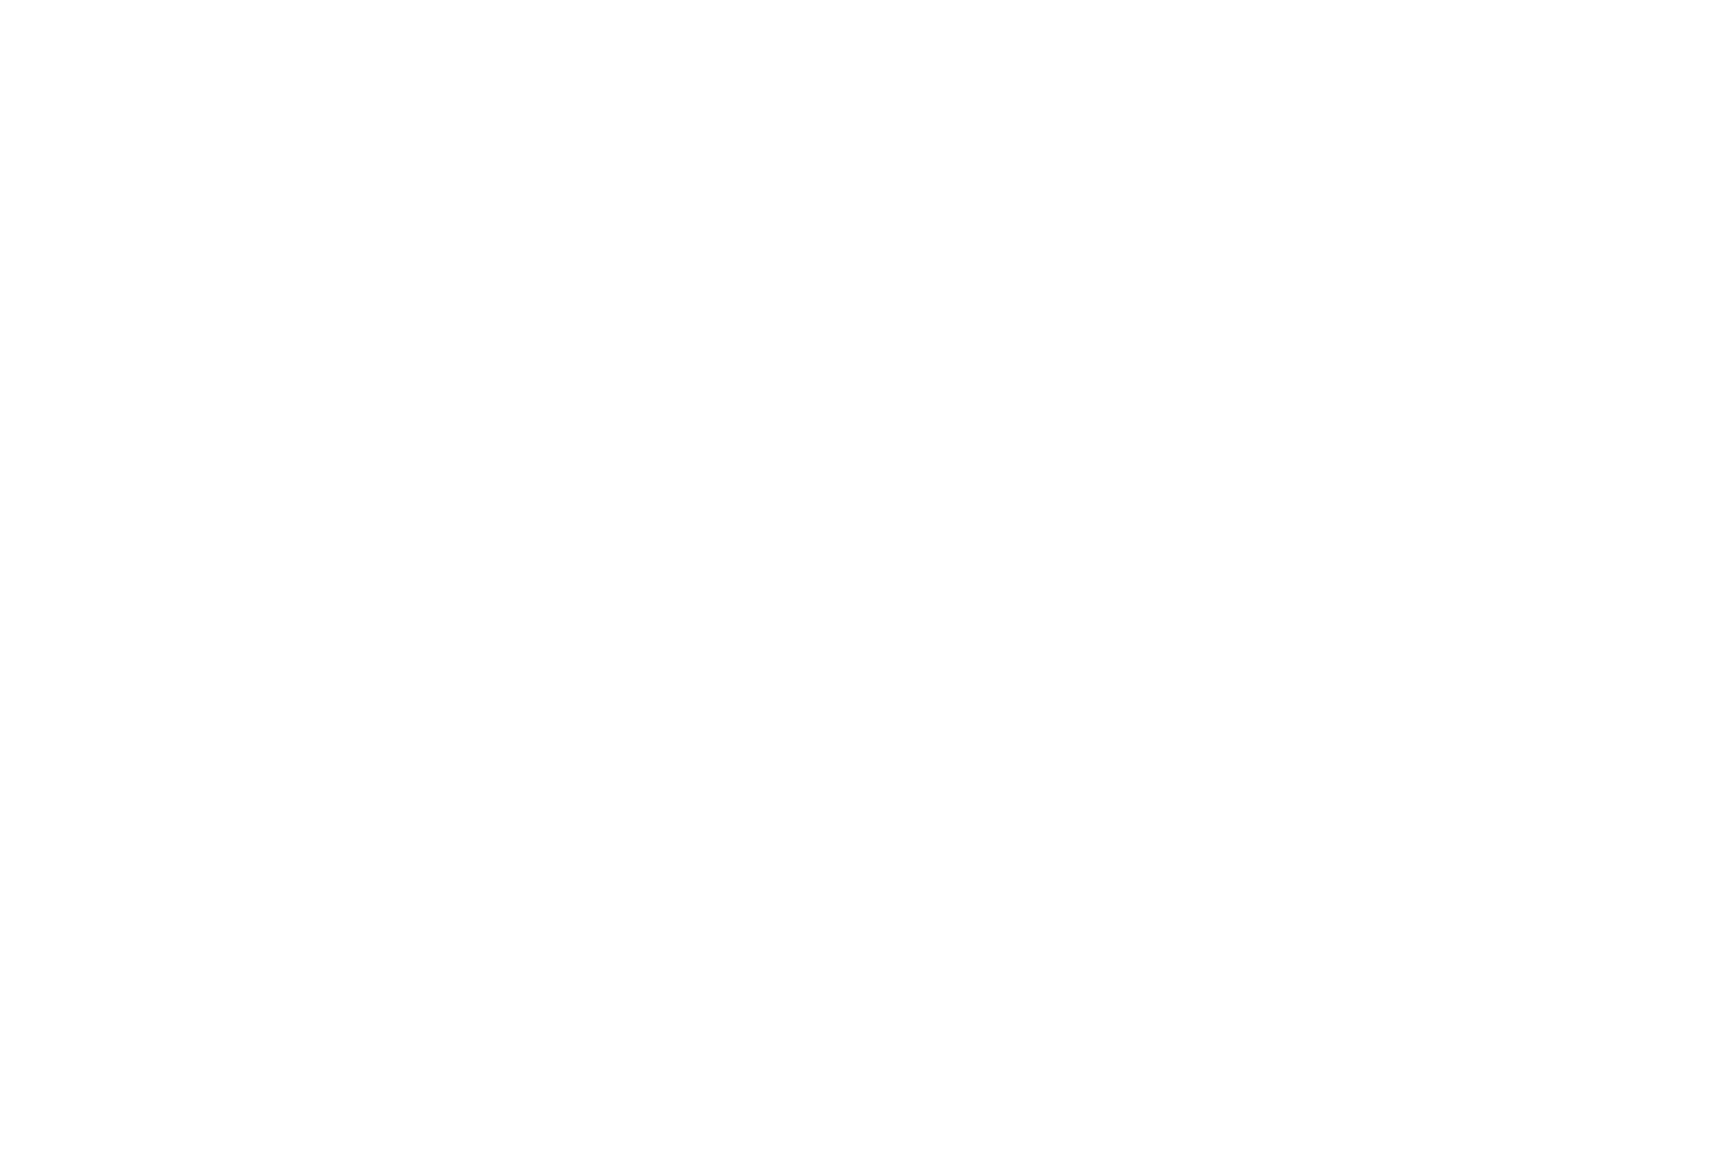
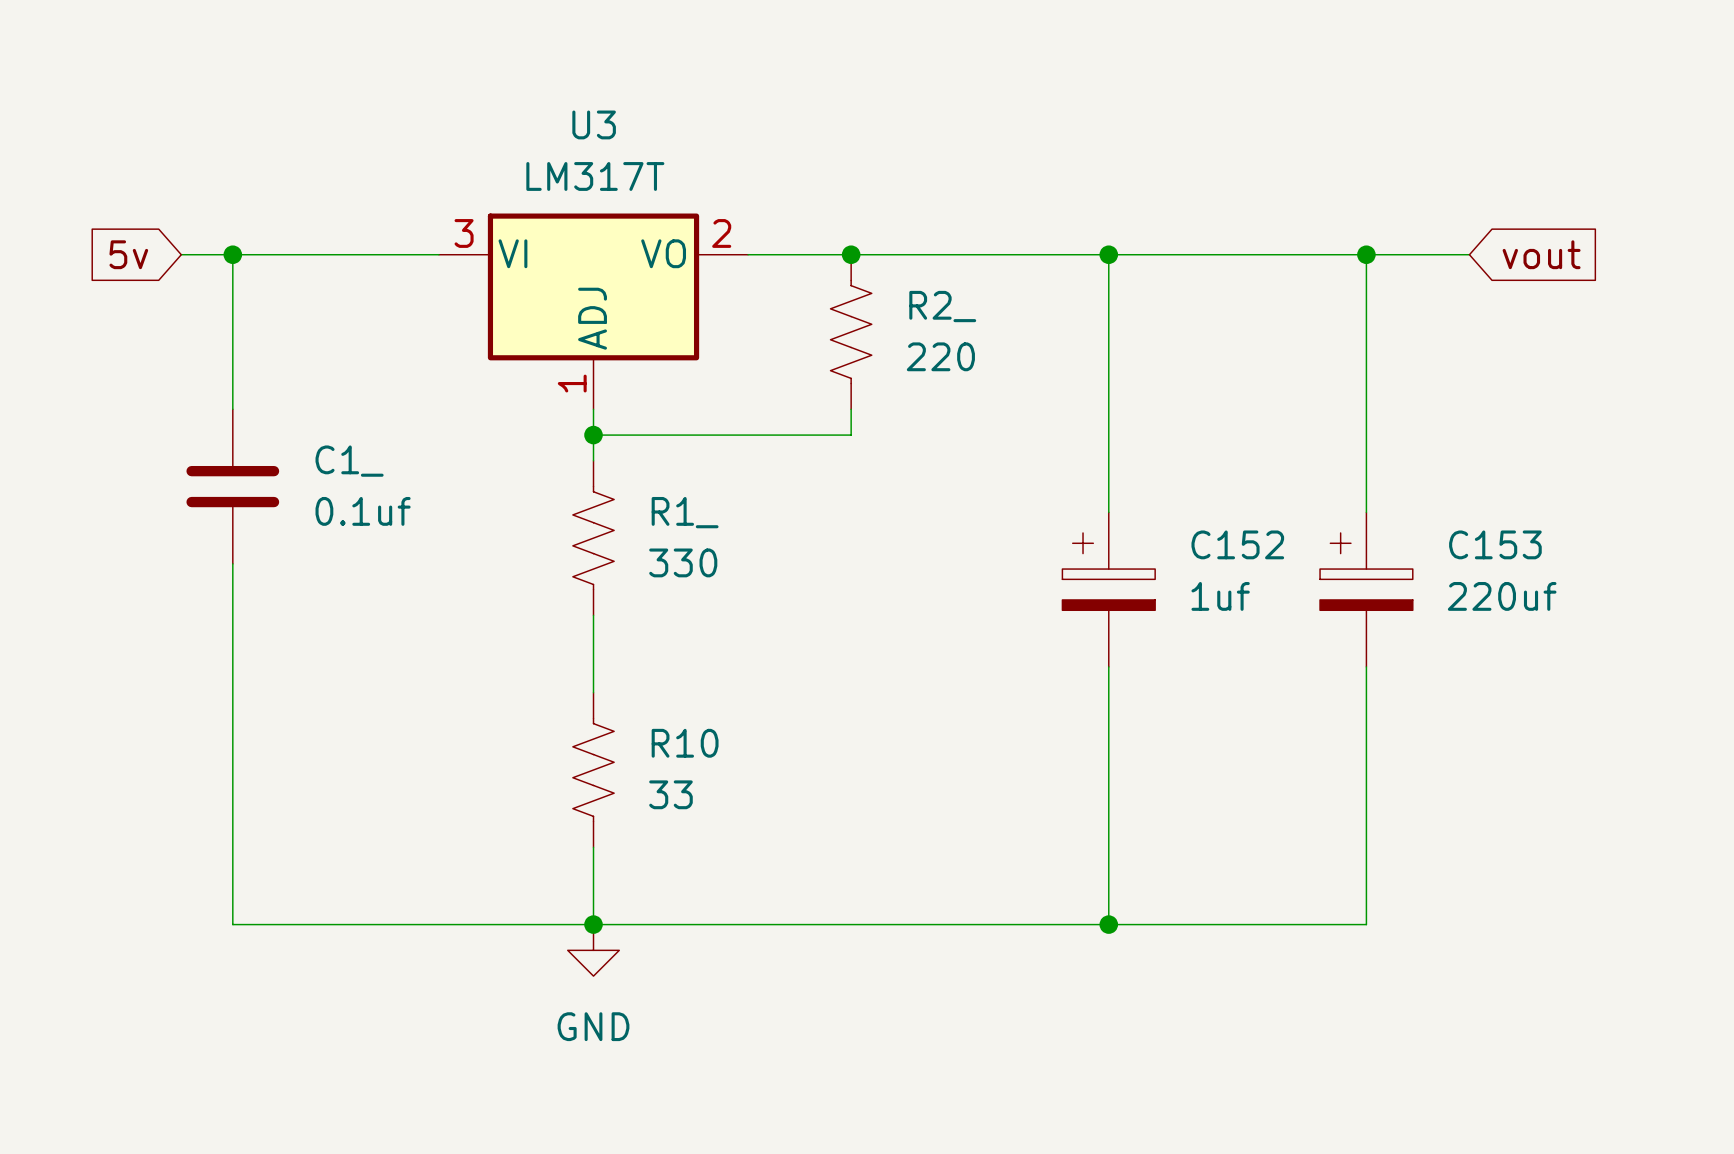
global label: none -> 5v (128, 254)
wire: none -> (181, 254) (438, 254)
wire: none -> (232, 254) (232, 409)
junction: none -> (232, 254)
wire: none -> (748, 254) (1469, 254)
junction: none -> (851, 254)
wire: none -> (1108, 254) (1108, 512)
junction: none -> (1108, 254)
wire: none -> (1366, 254) (1366, 512)
junction: none -> (1366, 254)
global label: none -> vout (1541, 254)
U3: none -> LM317T (593, 311)
R2_: none -> 220 (851, 332)
wire: none -> (593, 409) (593, 460)
wire: none -> (851, 409) (851, 435) (593, 435)
junction: none -> (593, 435)
C1_: none -> 0.1uf (232, 486)
R1_: none -> 330 (593, 538)
wire: none -> (232, 563) (232, 924) (1366, 924) (1366, 666)
C152: none -> 1uf (1108, 589)
C153: none -> 220uf (1366, 589)
wire: none -> (593, 615) (593, 692)
wire: none -> (1108, 666) (1108, 924)
R10: none -> 33 (593, 770)
wire: none -> (593, 847) (593, 924)
junction: none -> (593, 924)
junction: none -> (1108, 924)
power symbol: none -> GND (593, 950)

